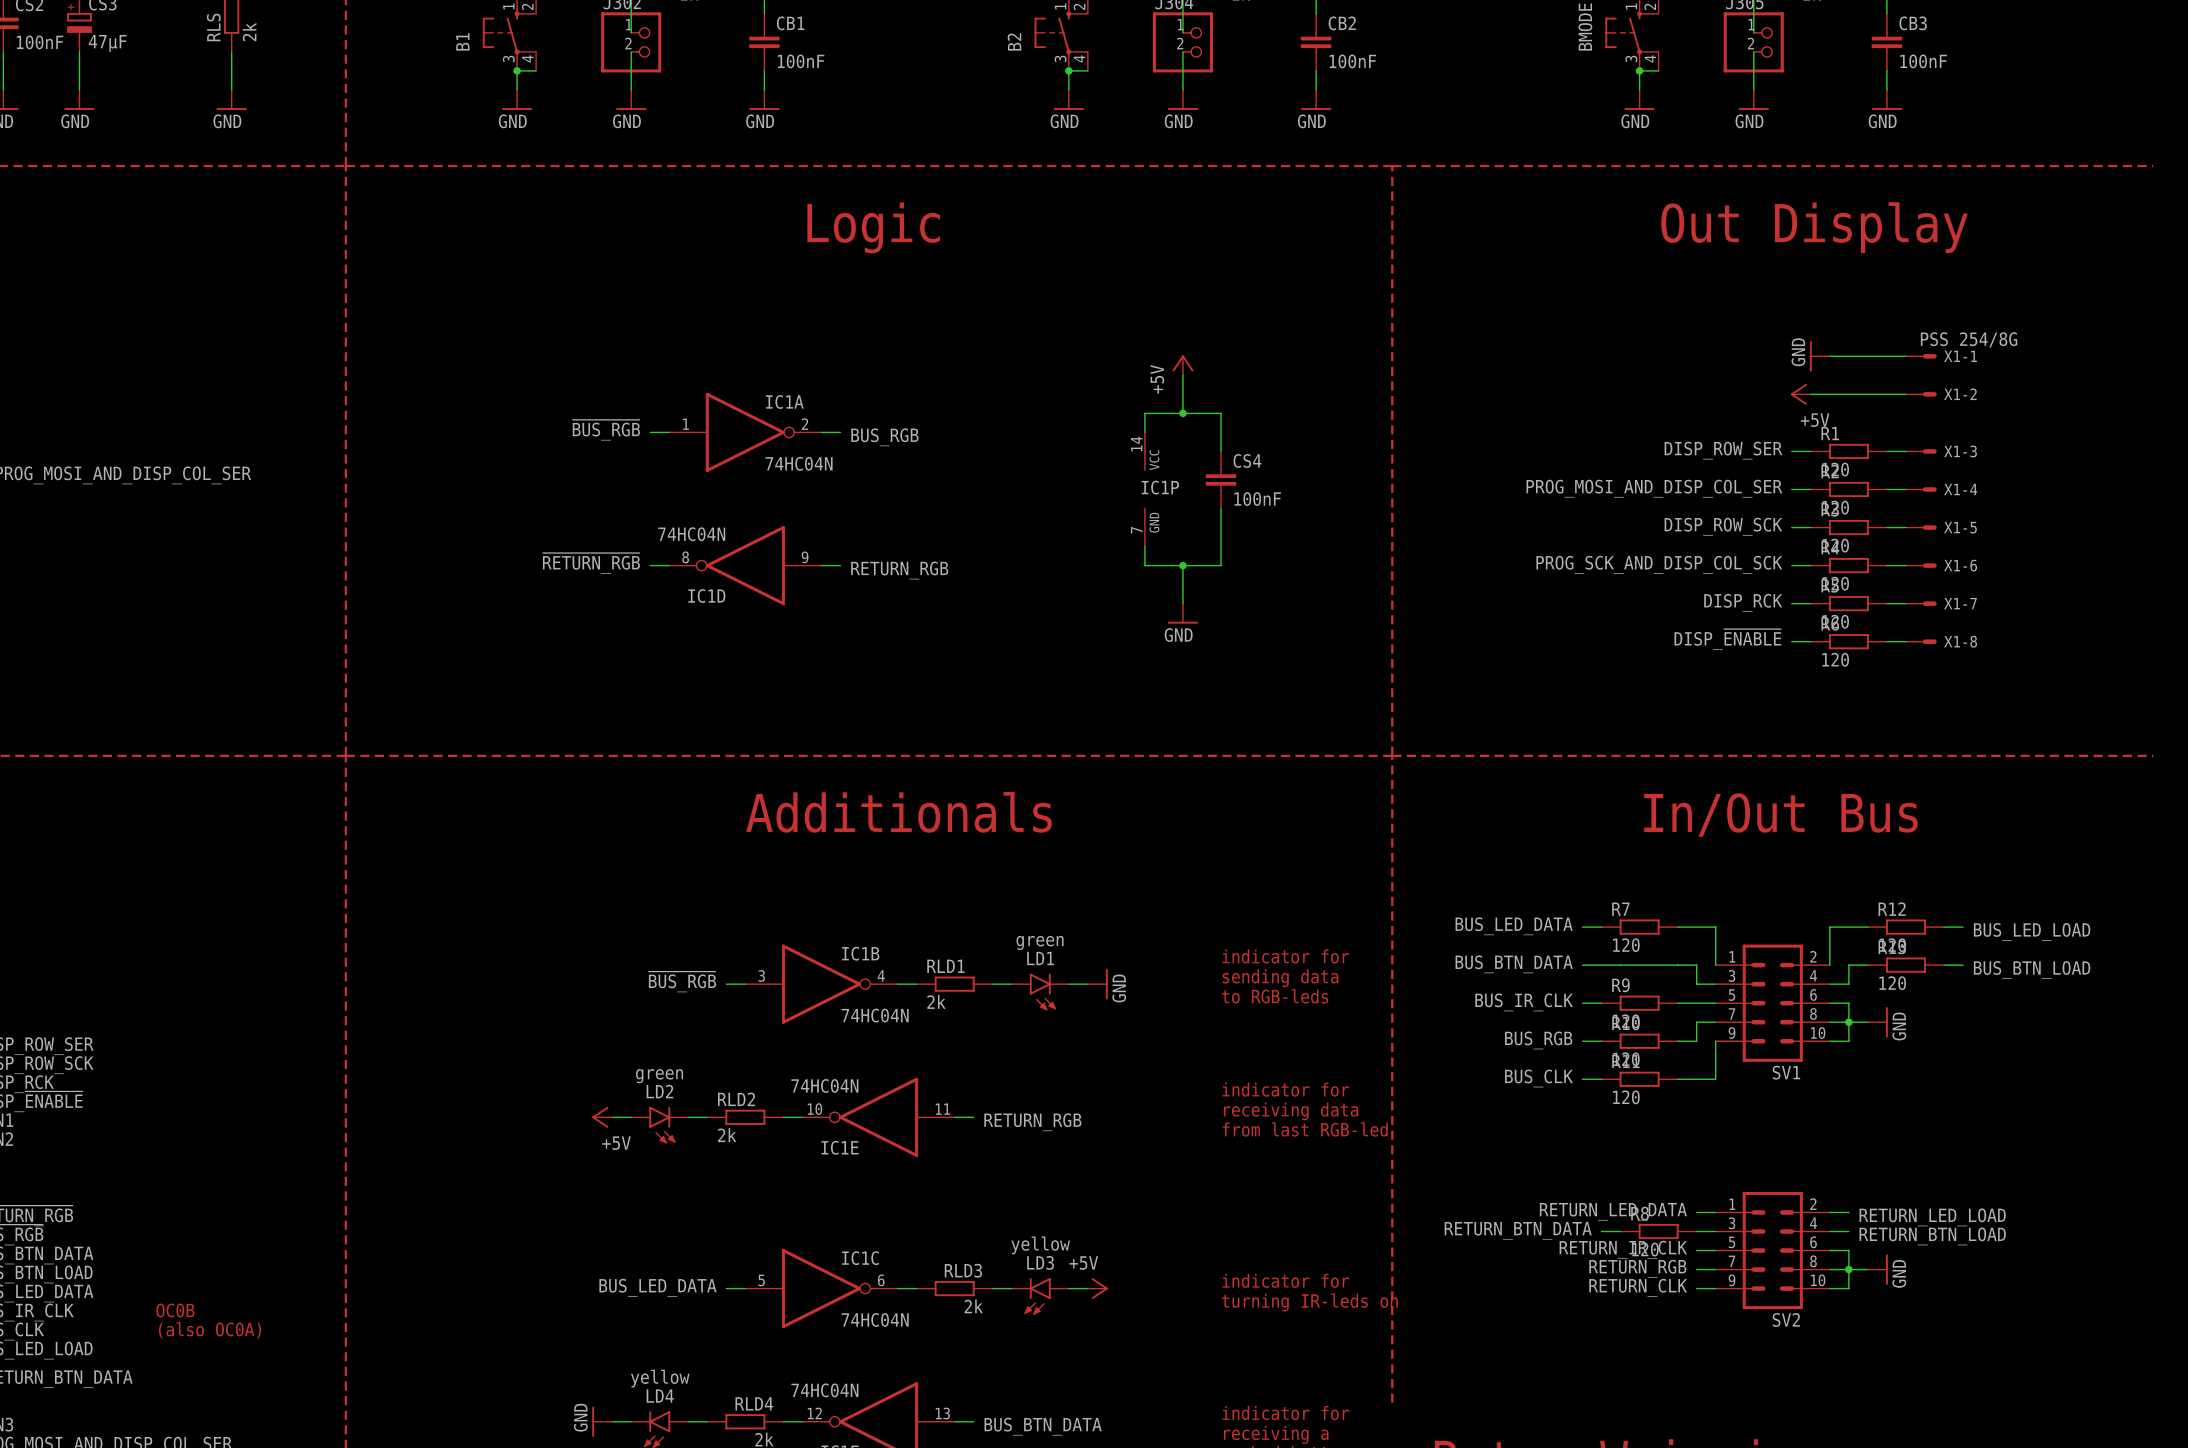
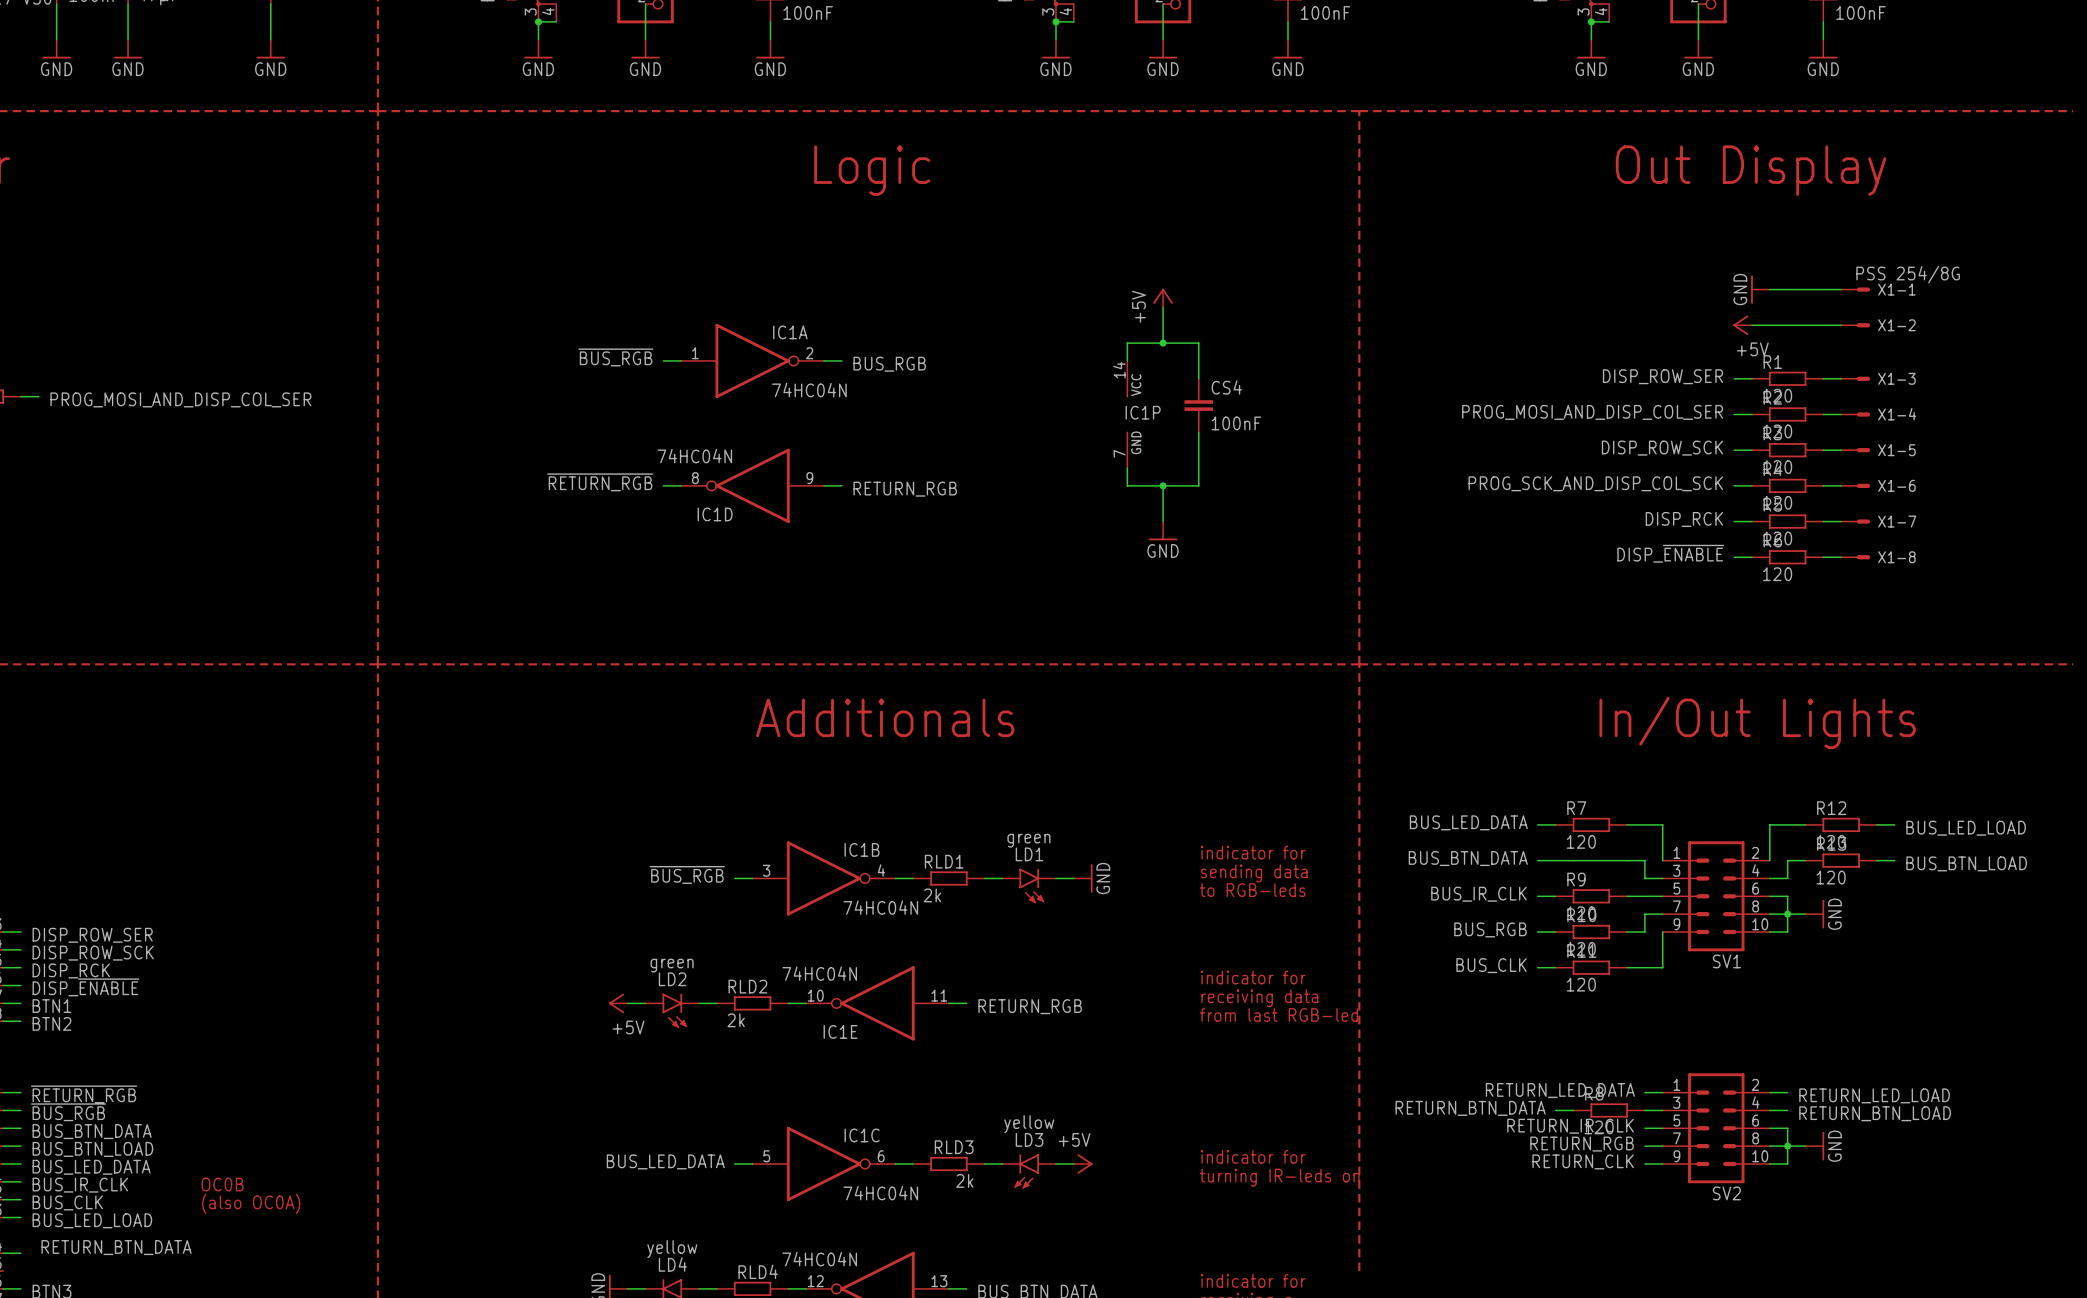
text: In/Out Bus (1780, 815) -> In/Out Lights (1757, 722)

